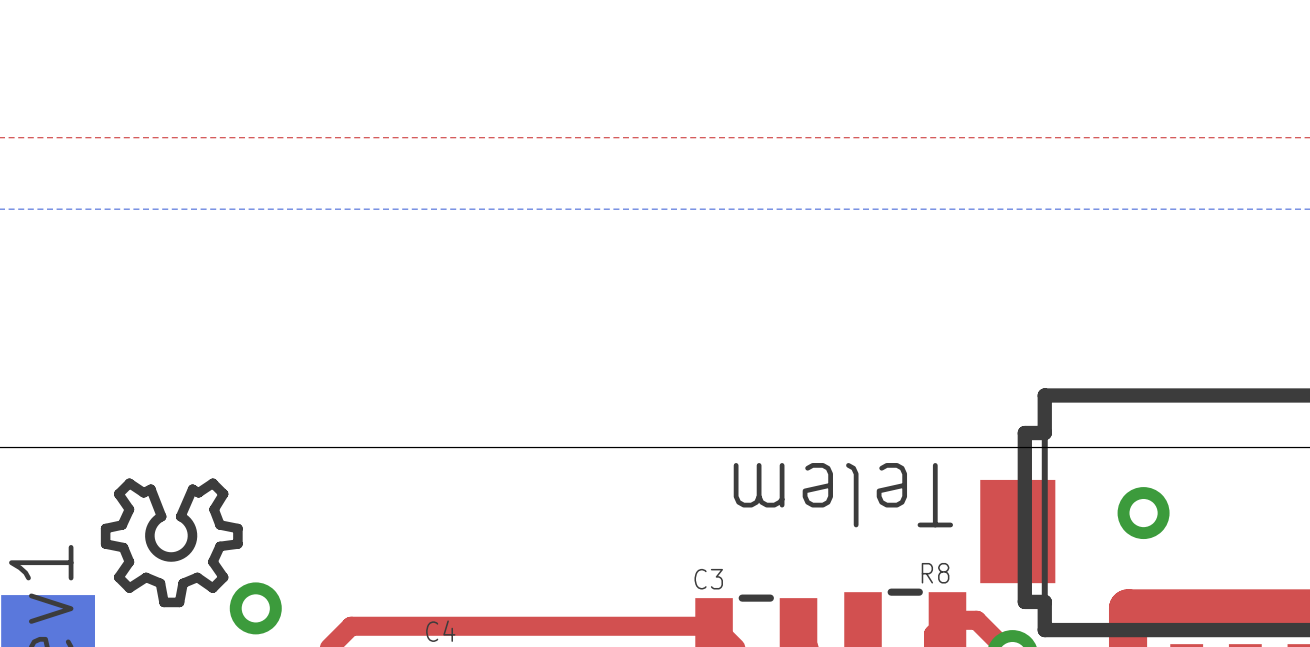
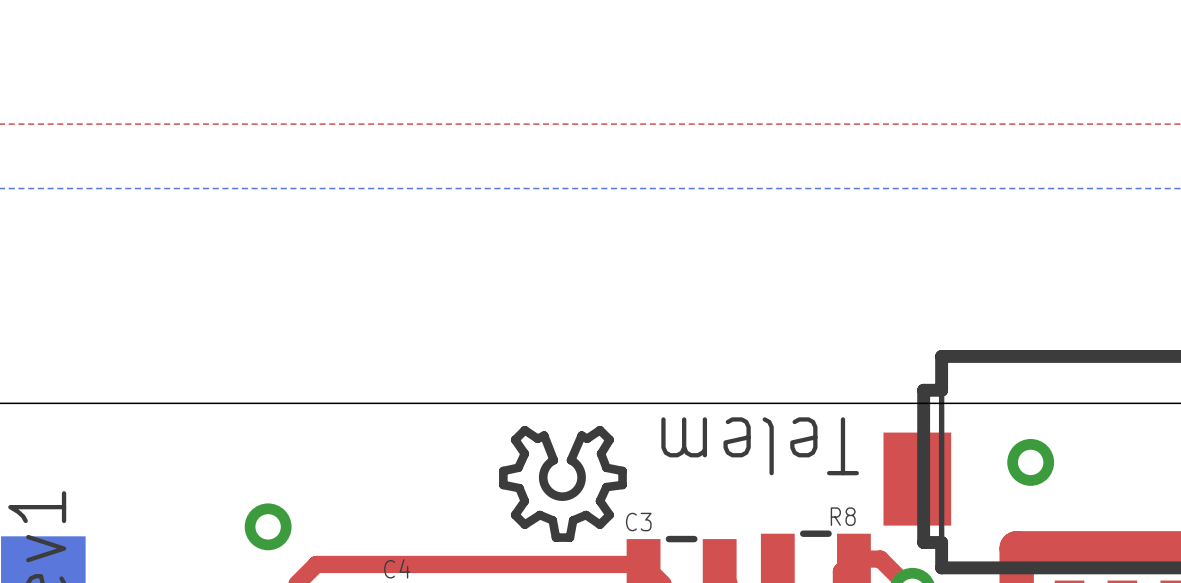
drawing position: (171, 542) -> (562, 483)
via position: (255, 608) -> (268, 526)

